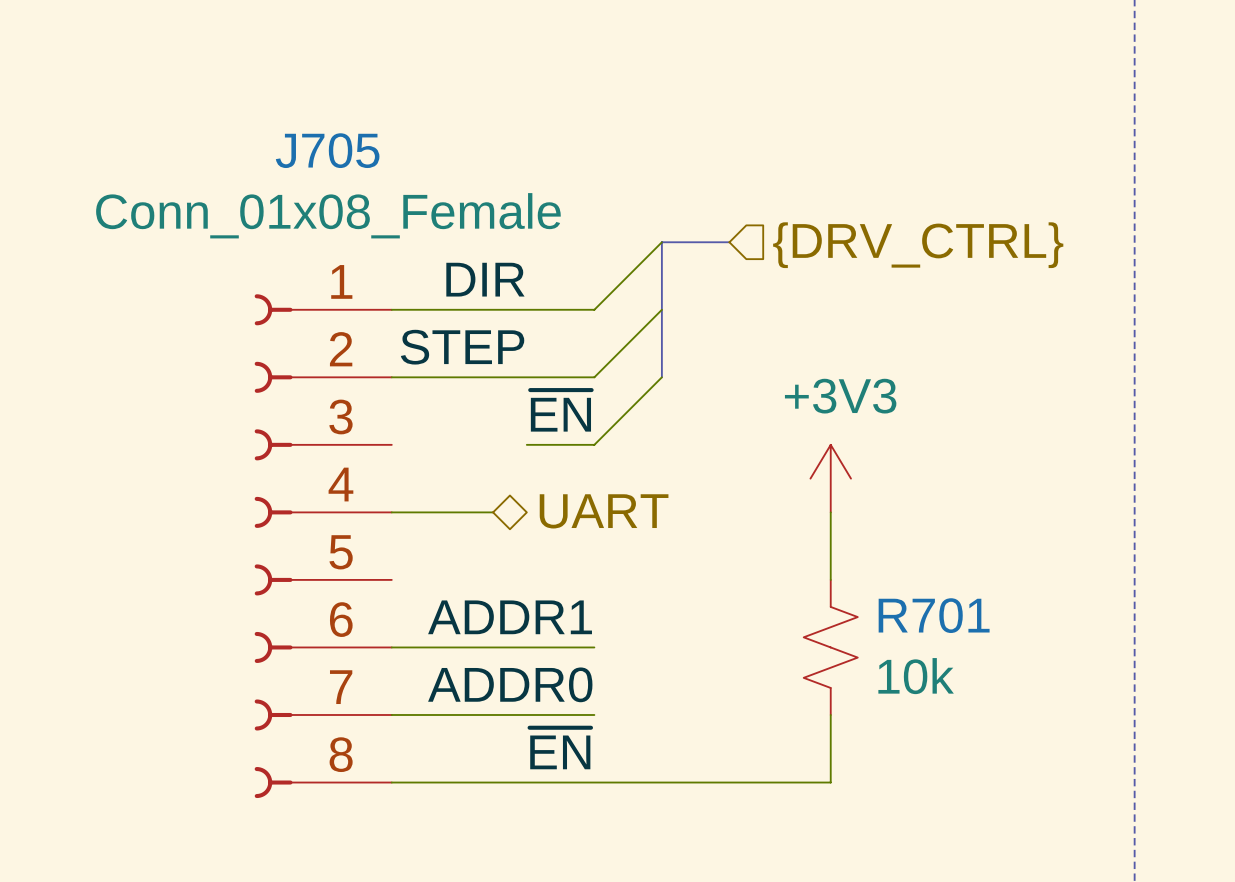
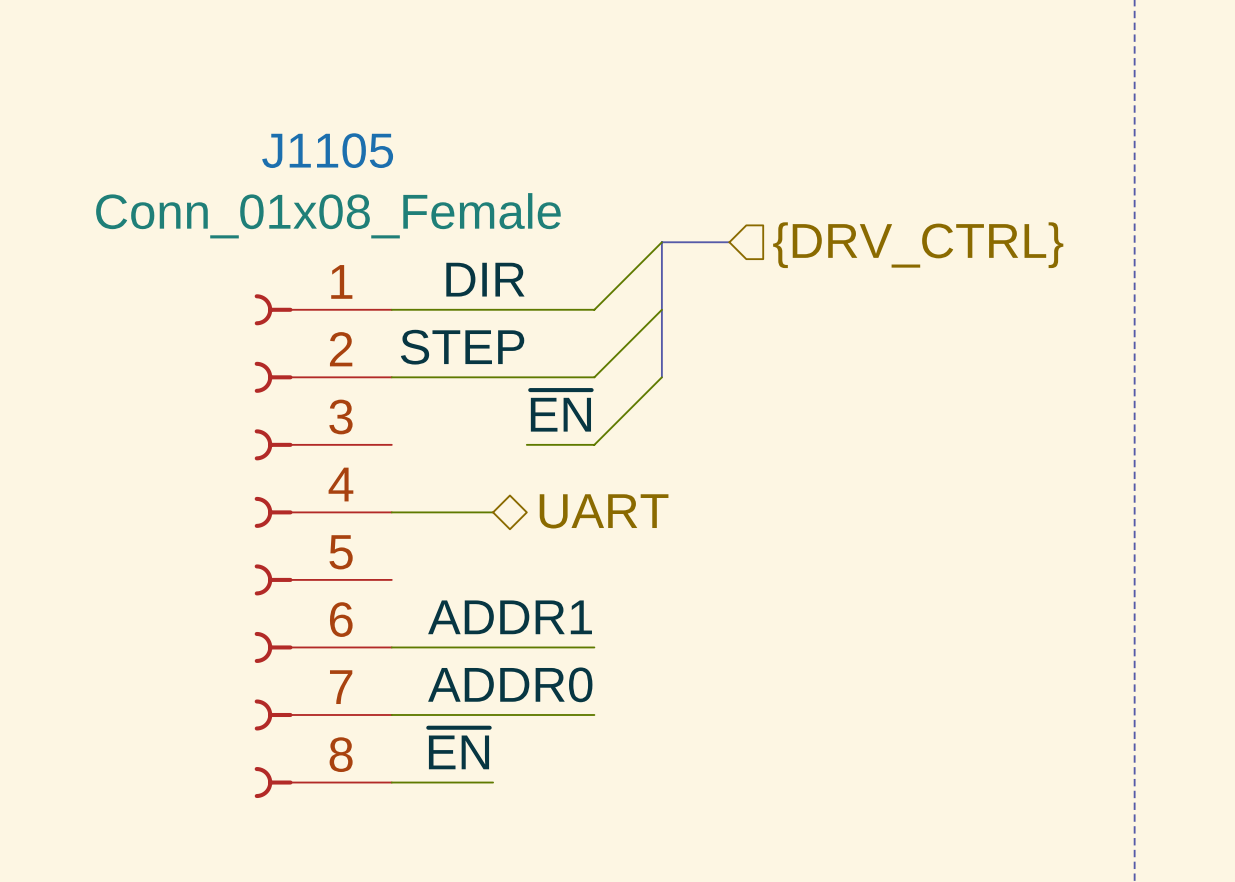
J705 name: J705 (327, 150) -> J1105 (327, 150)
power symbol: +3V3 (830, 478) -> none
wire: (830, 512) (830, 579) -> none
R701: 10k (830, 647) -> none
wire: (830, 714) (830, 782) (493, 782) -> none
label position: ~{EN} (560, 748) -> ~{EN} (458, 748)

